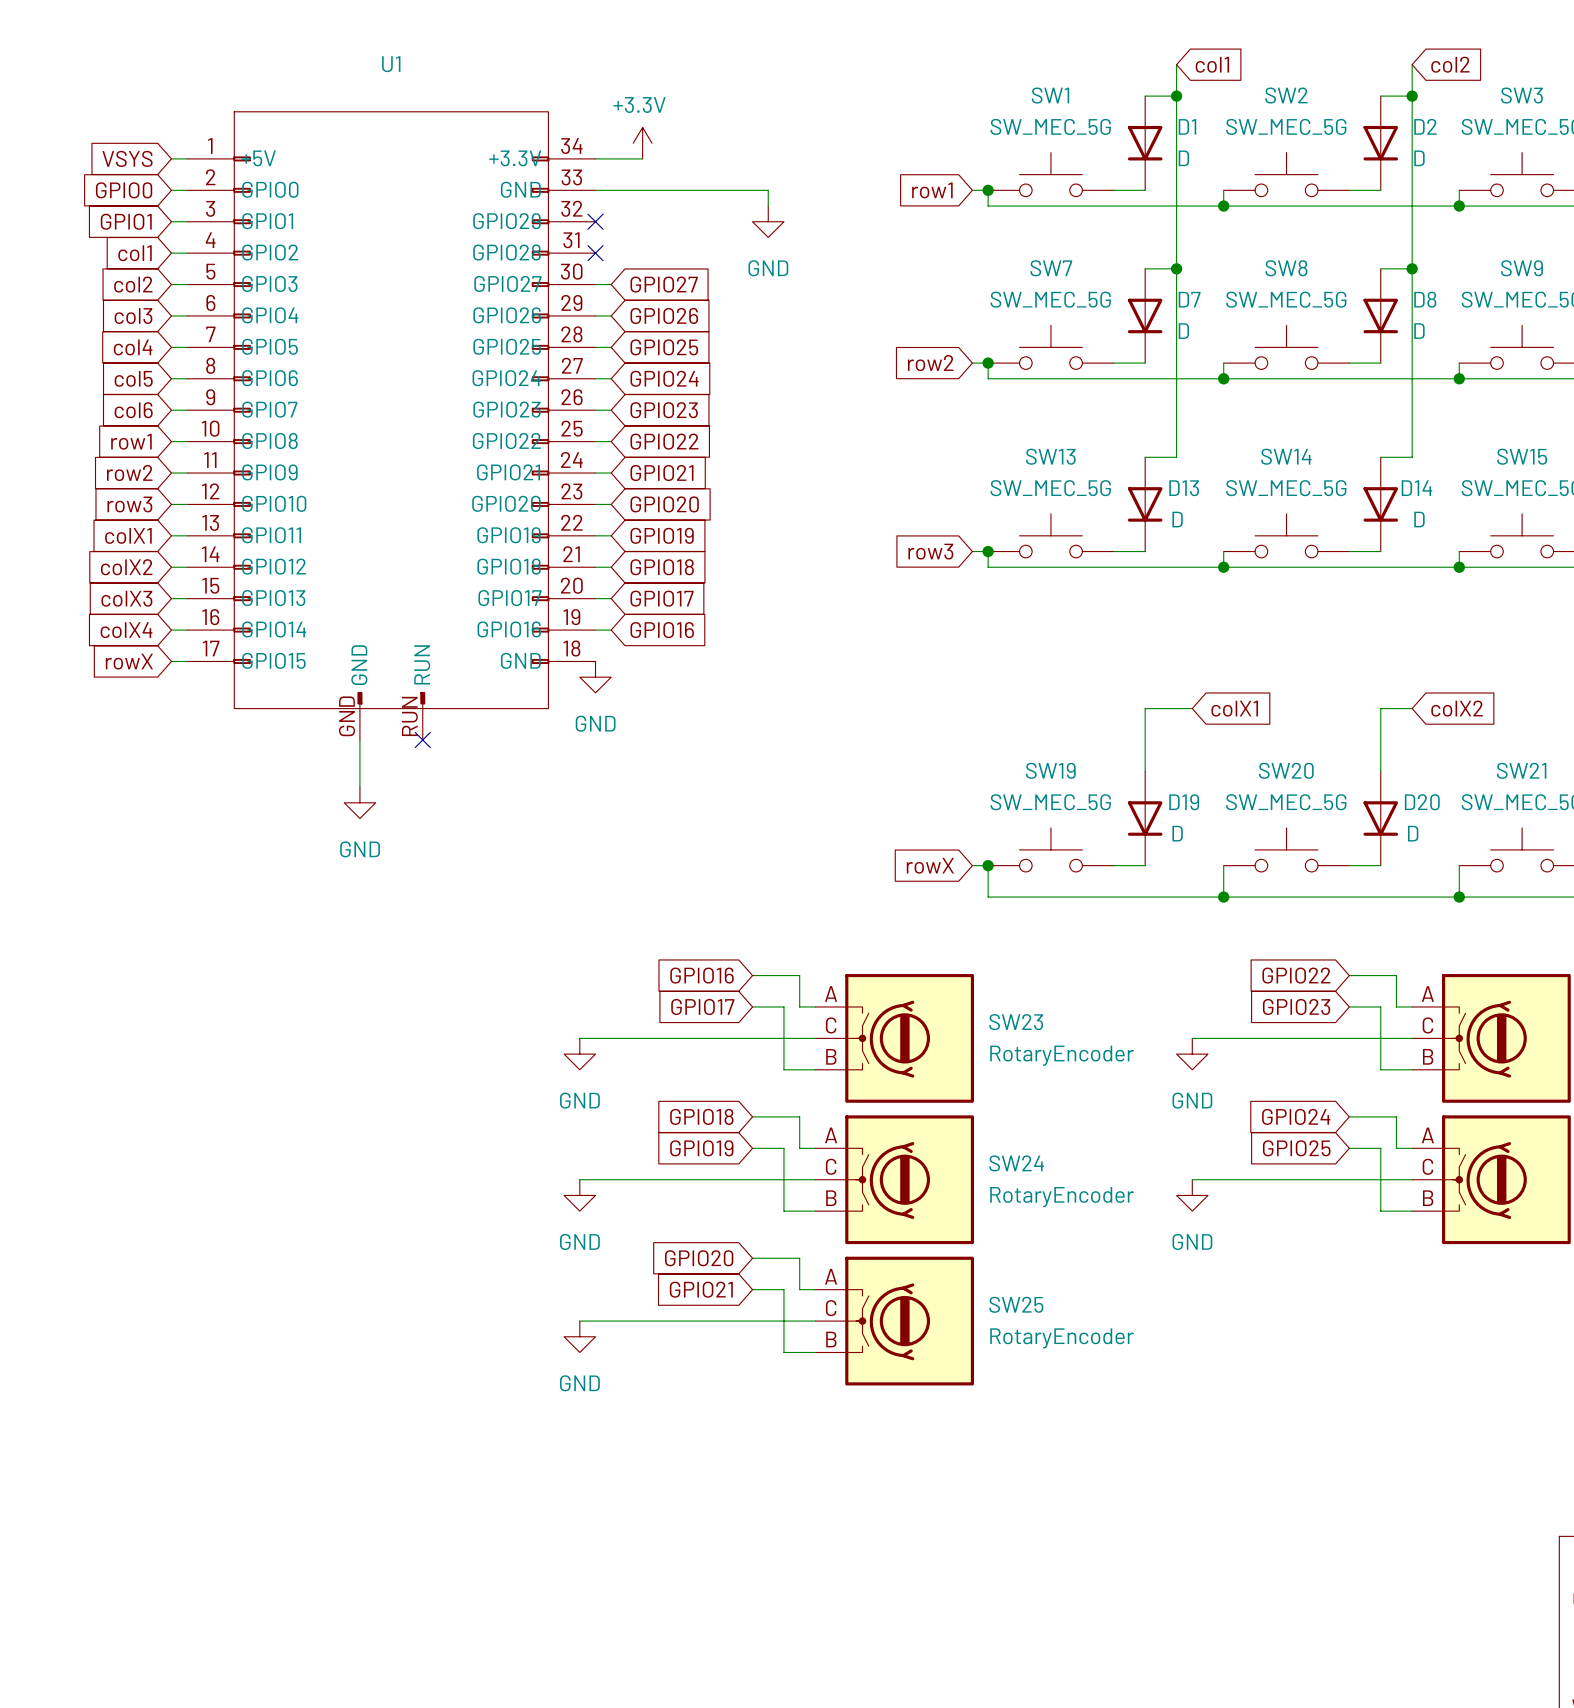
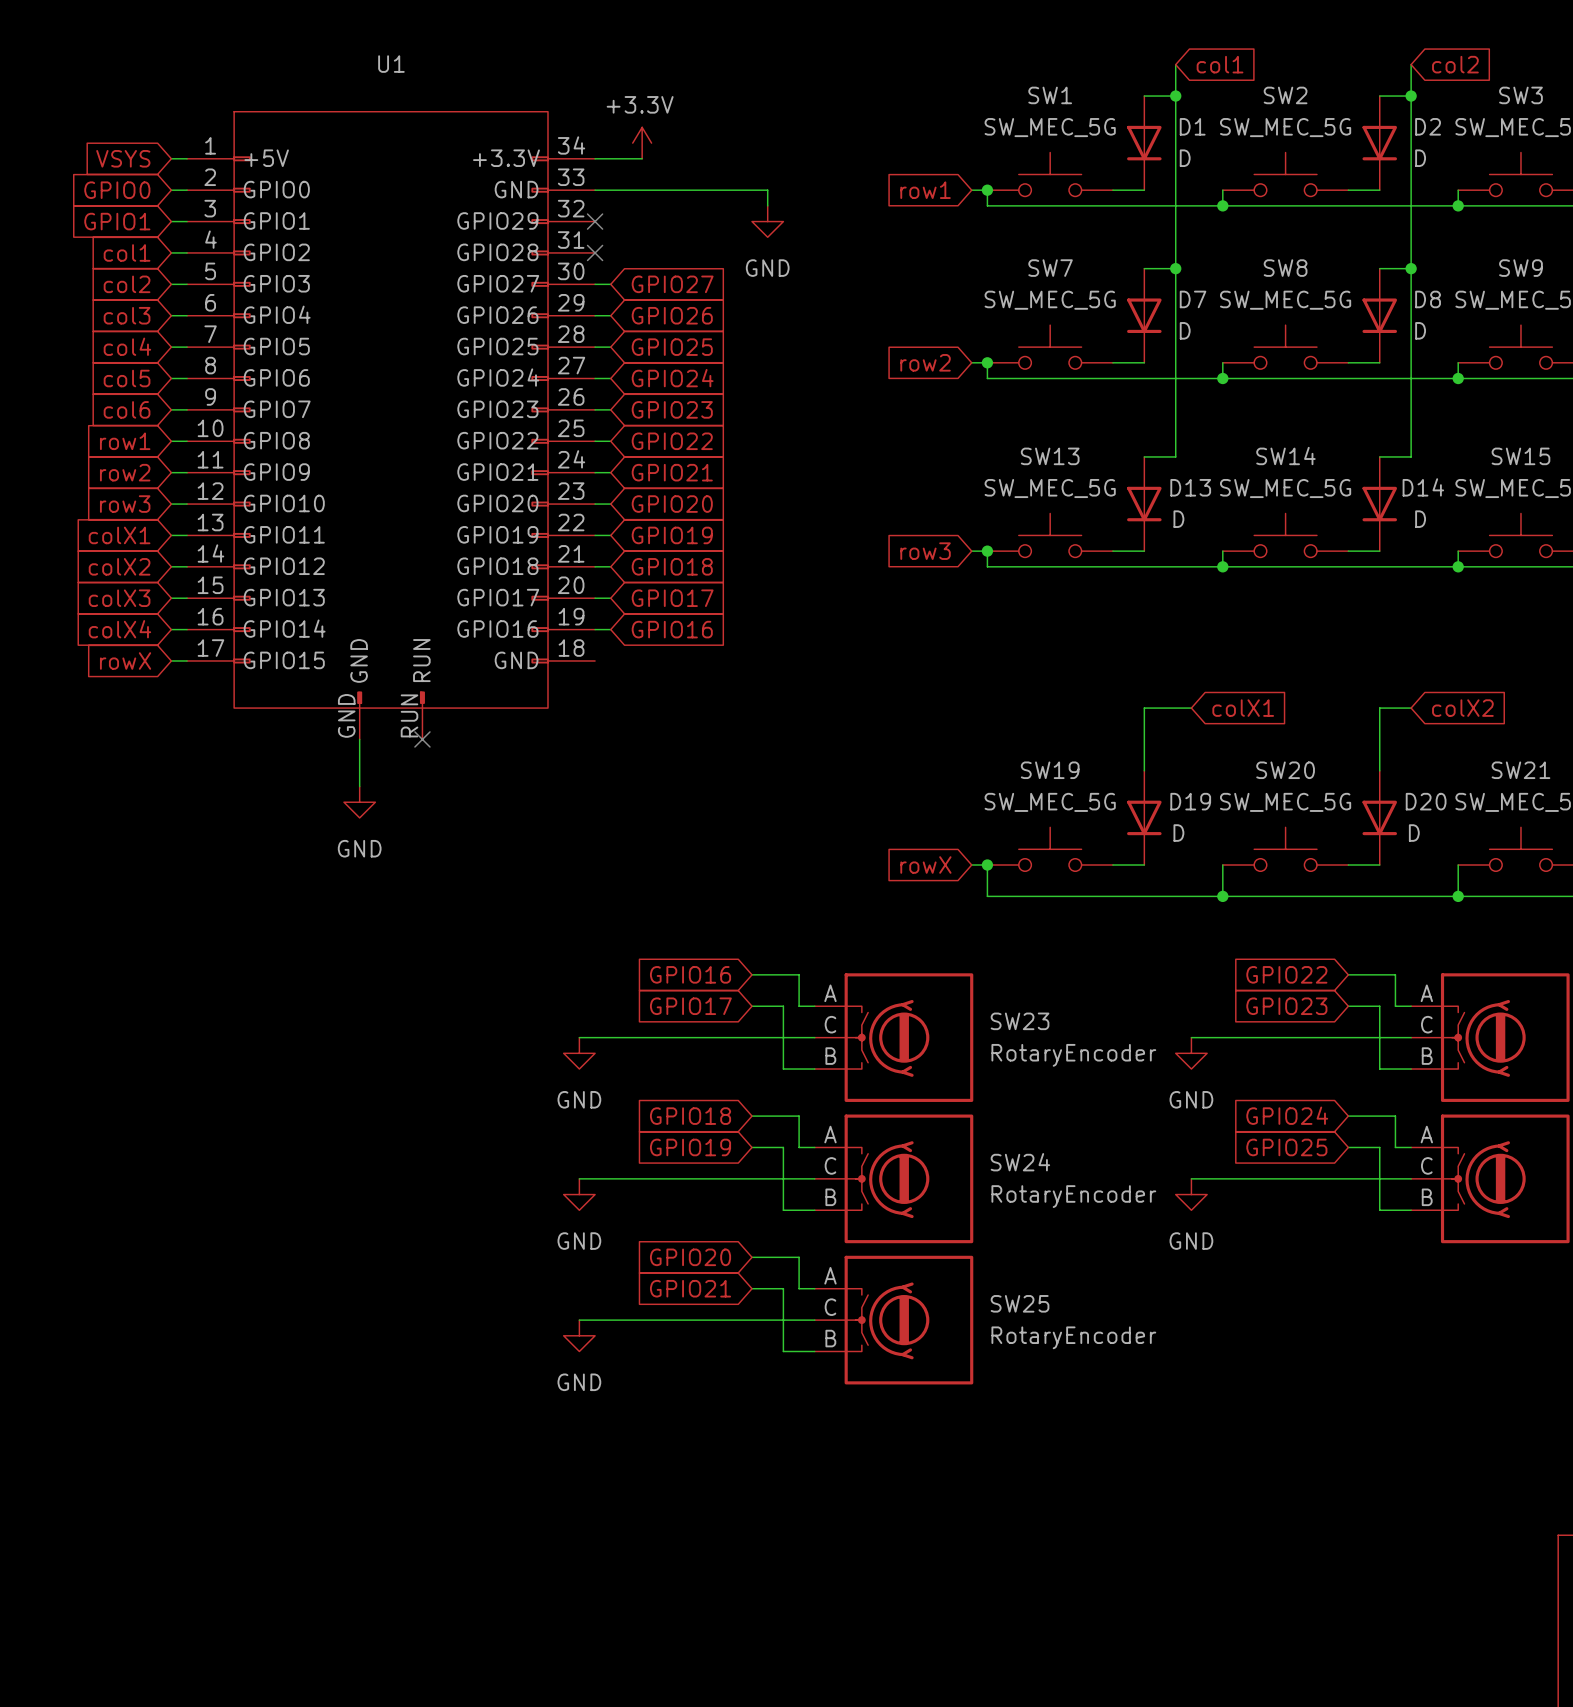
power symbol: GND (595, 677) -> none

